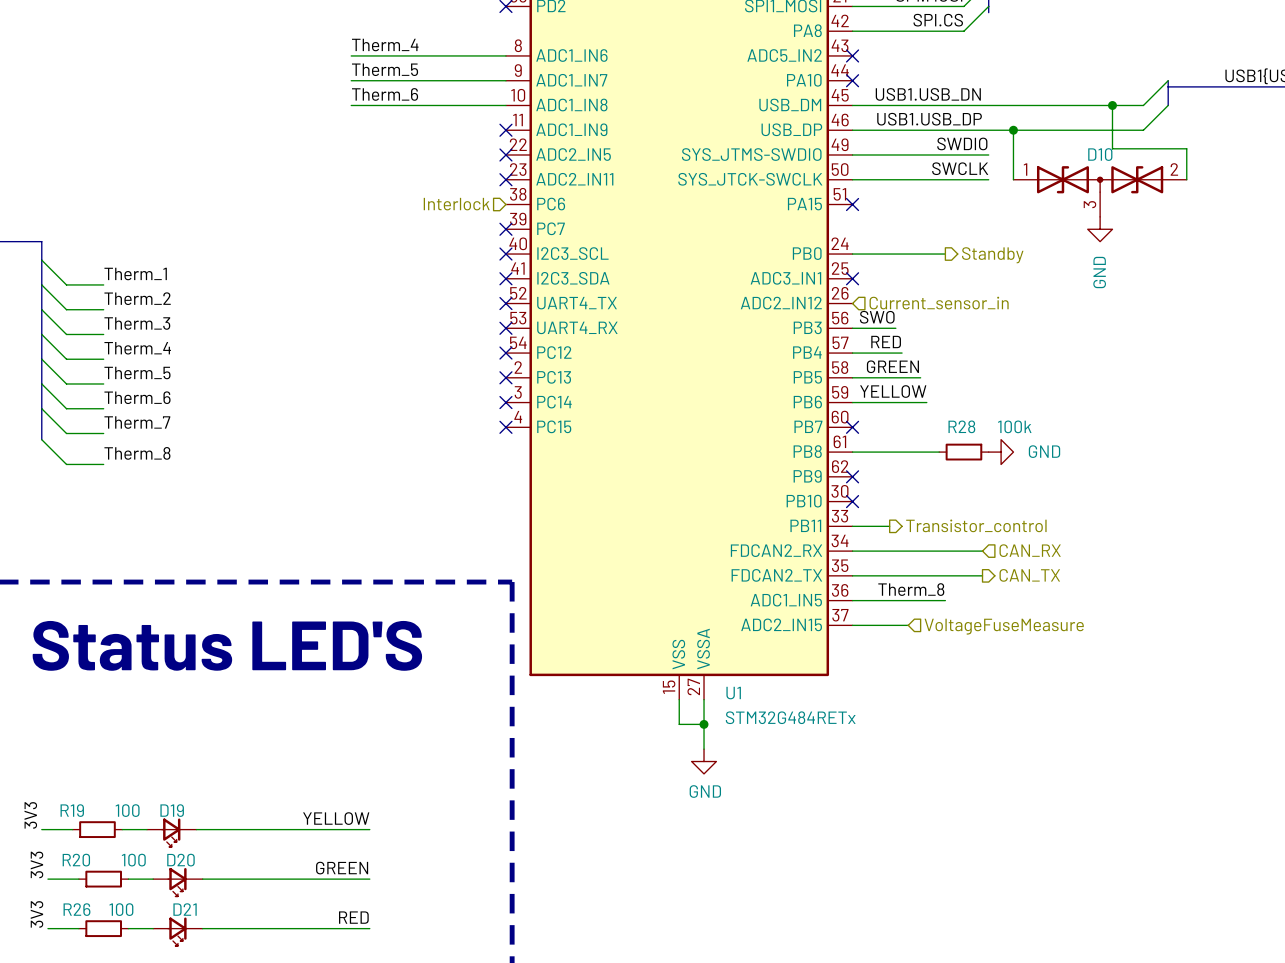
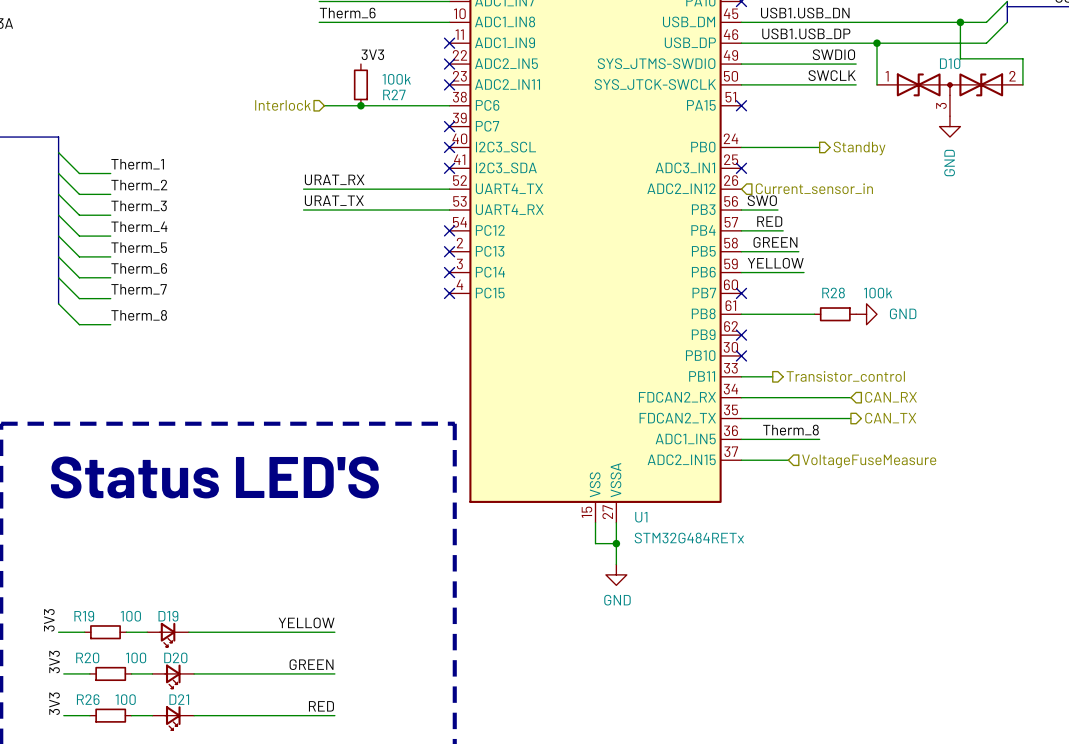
label: none -> 3V3 (372, 54)
R27: none -> 100k (360, 84)
wire: none -> (324, 105) (449, 105)
junction: none -> (360, 105)
hierarchical label position: Interlock (456, 204) -> Interlock (282, 105)
label: none -> URAT_RX (334, 179)
wire: none -> (303, 189) (449, 189)
no-connect mark: (505, 303) -> none
label: none -> URAT_TX (334, 200)
wire: none -> (303, 210) (449, 210)
no-connect mark: (505, 328) -> none

